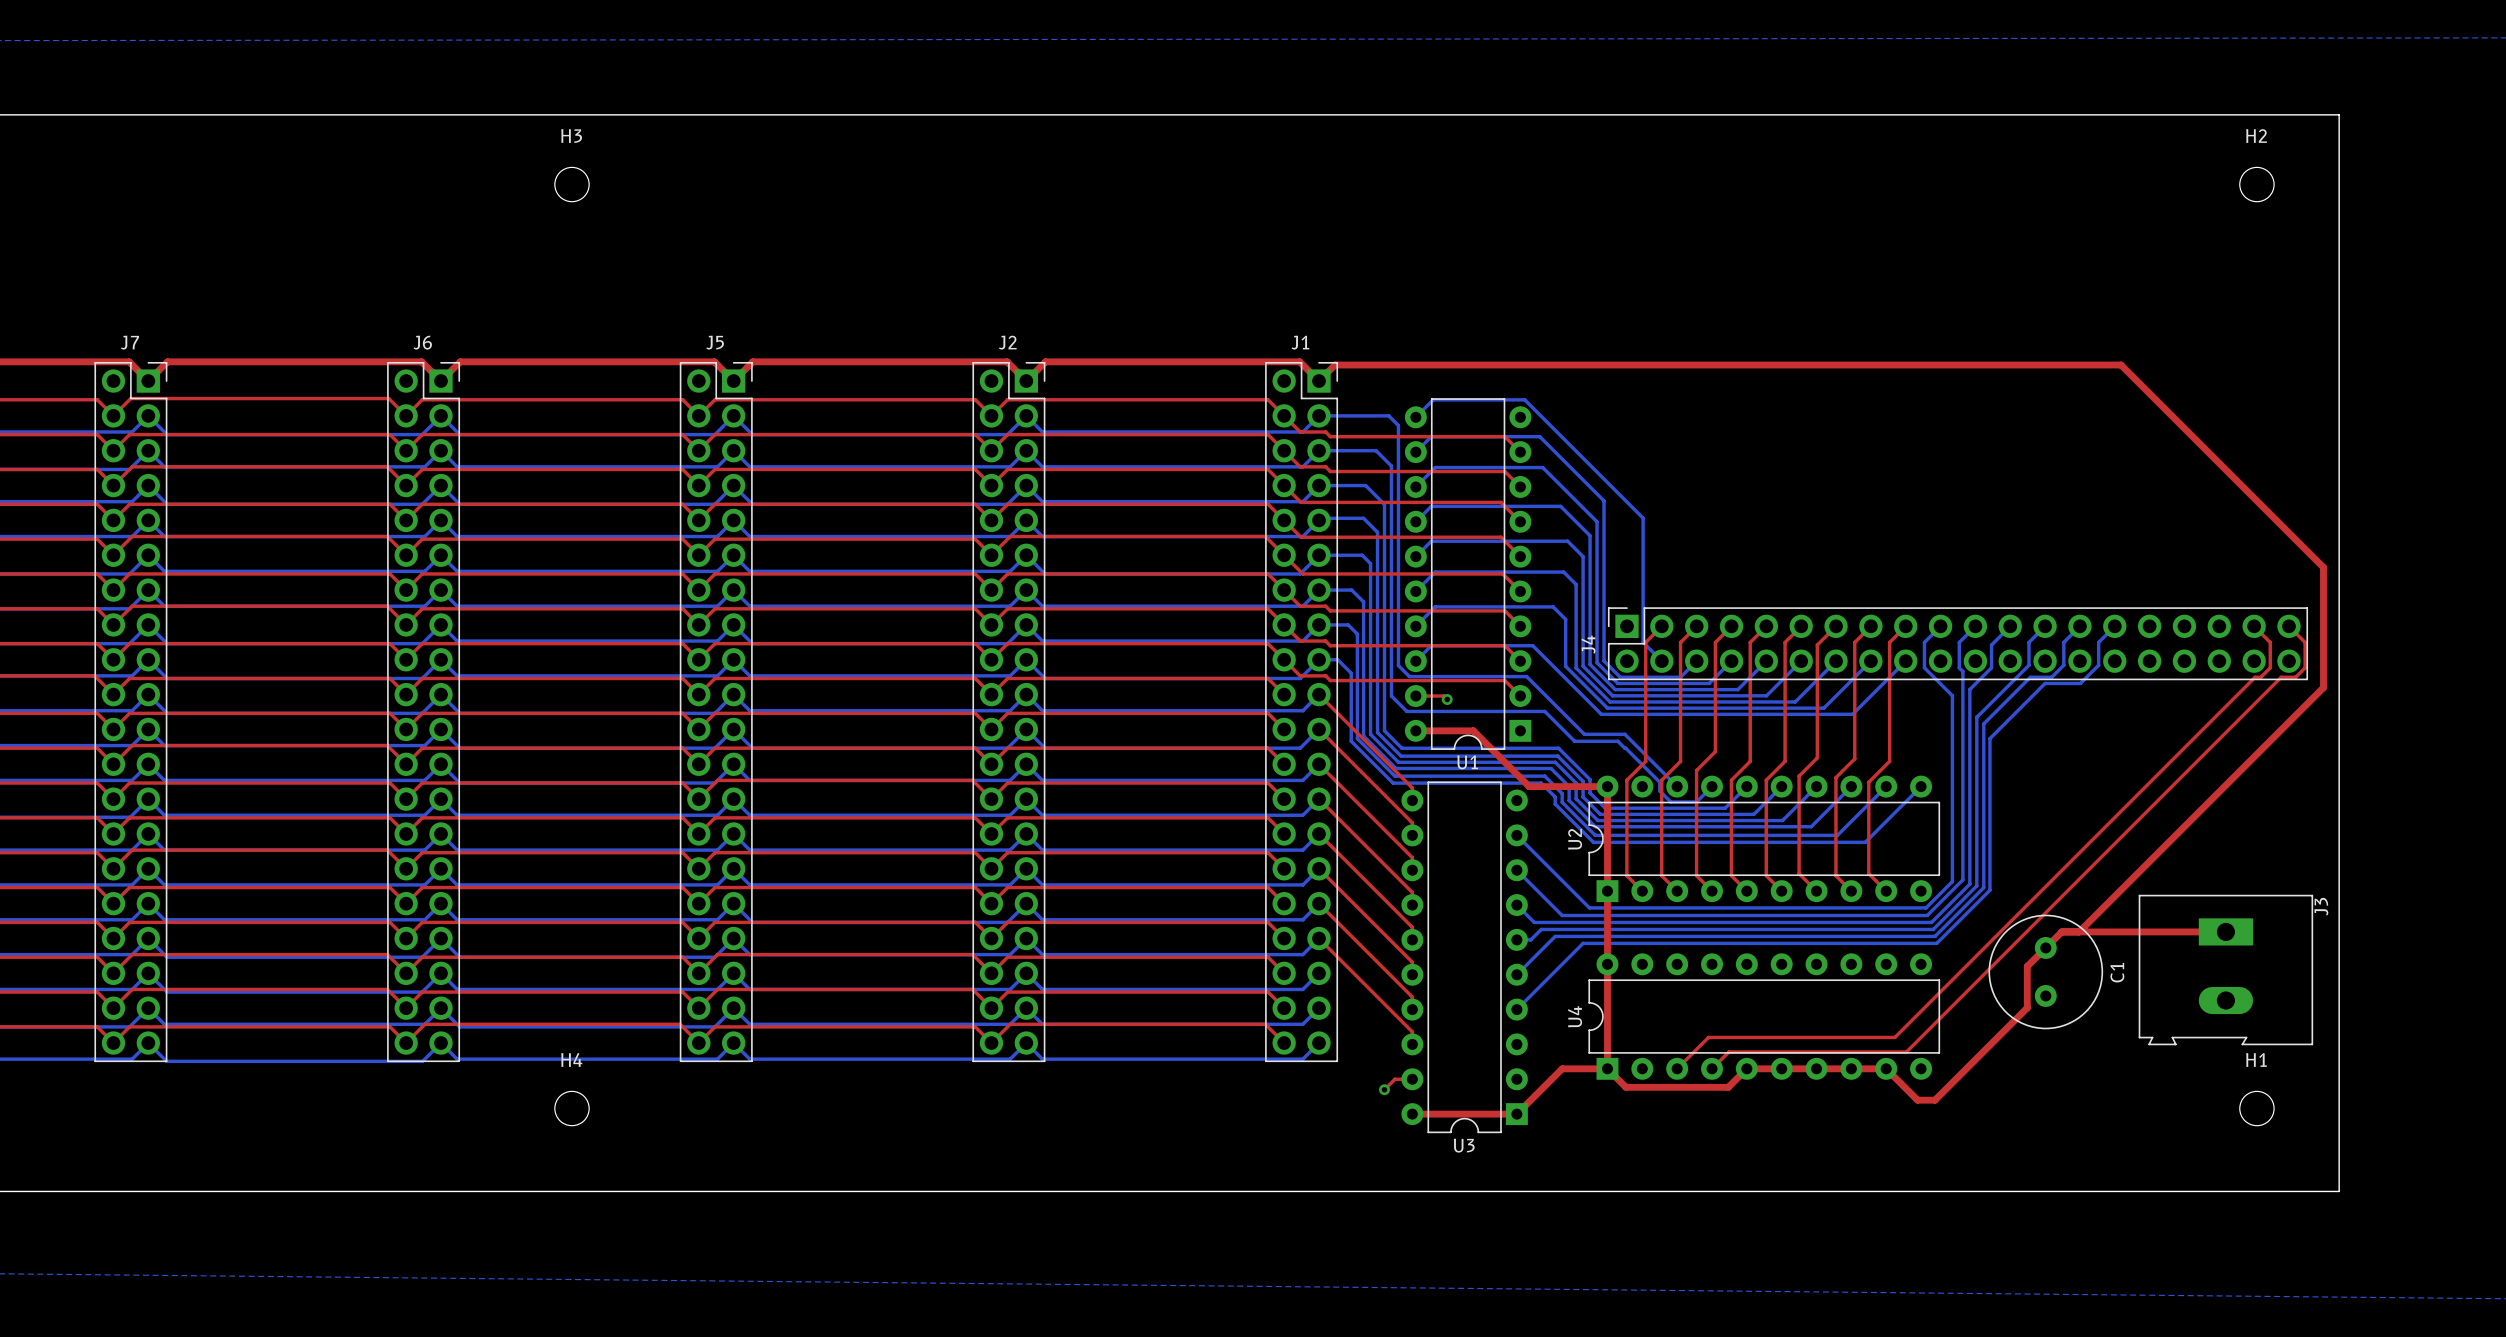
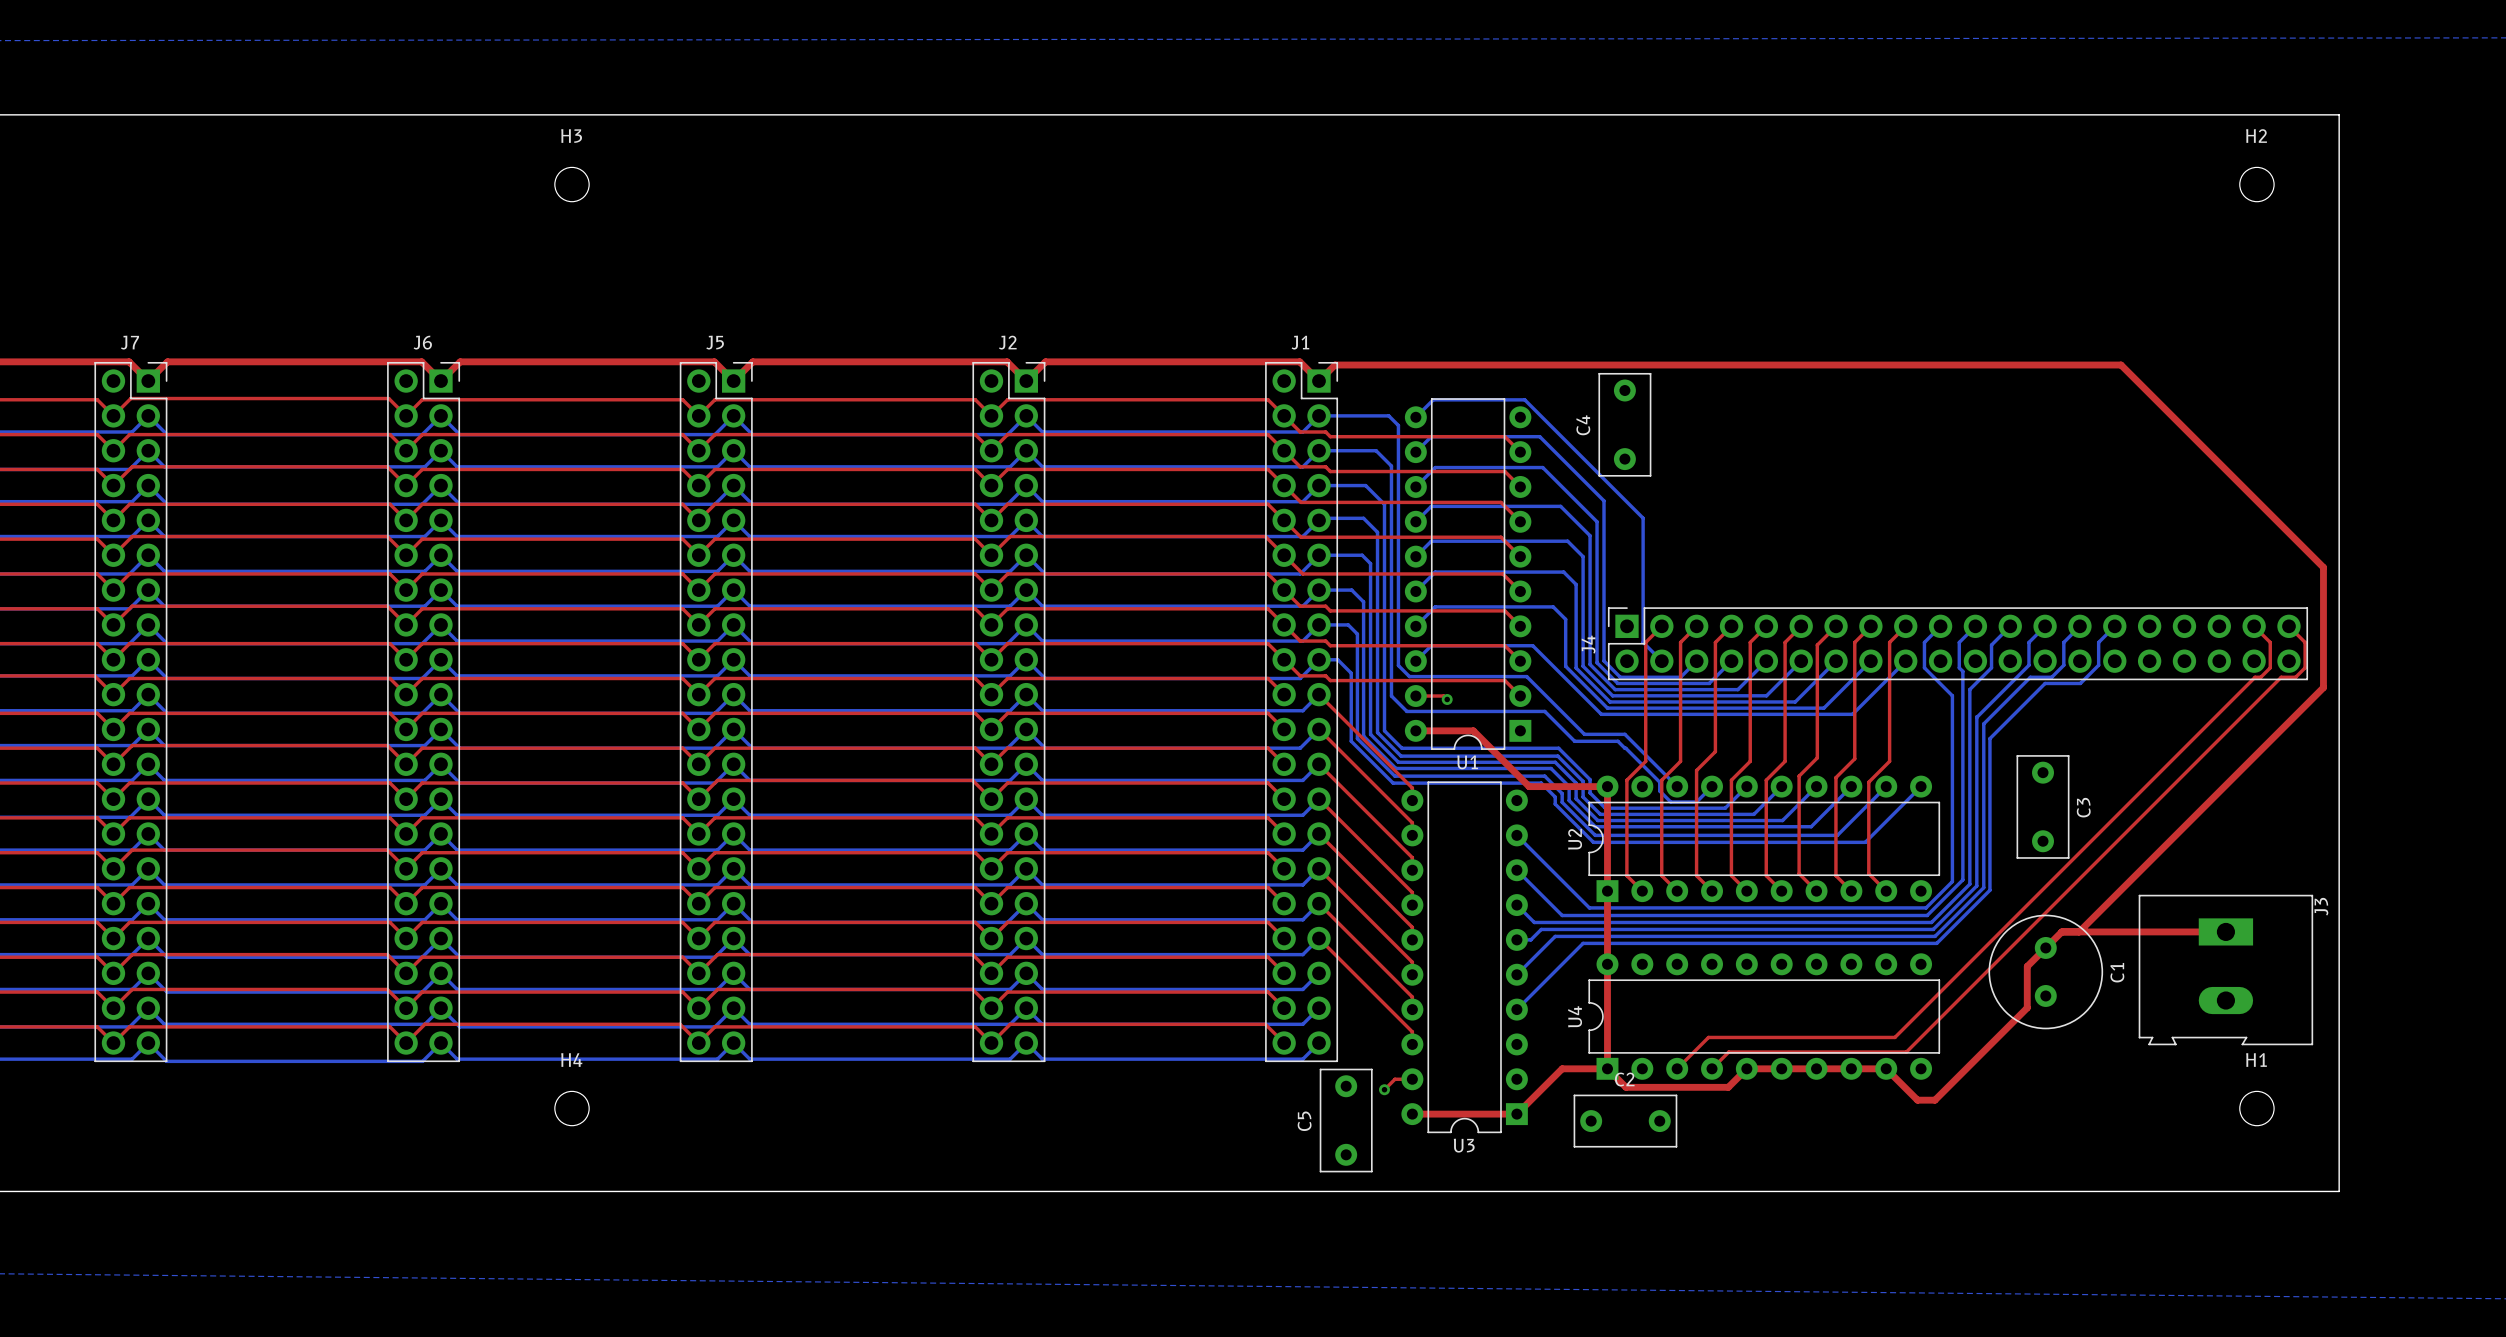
C4: none -> (1624, 424)
C3: none -> (2043, 806)
C5: none -> (1346, 1120)
C2: none -> (1625, 1121)

